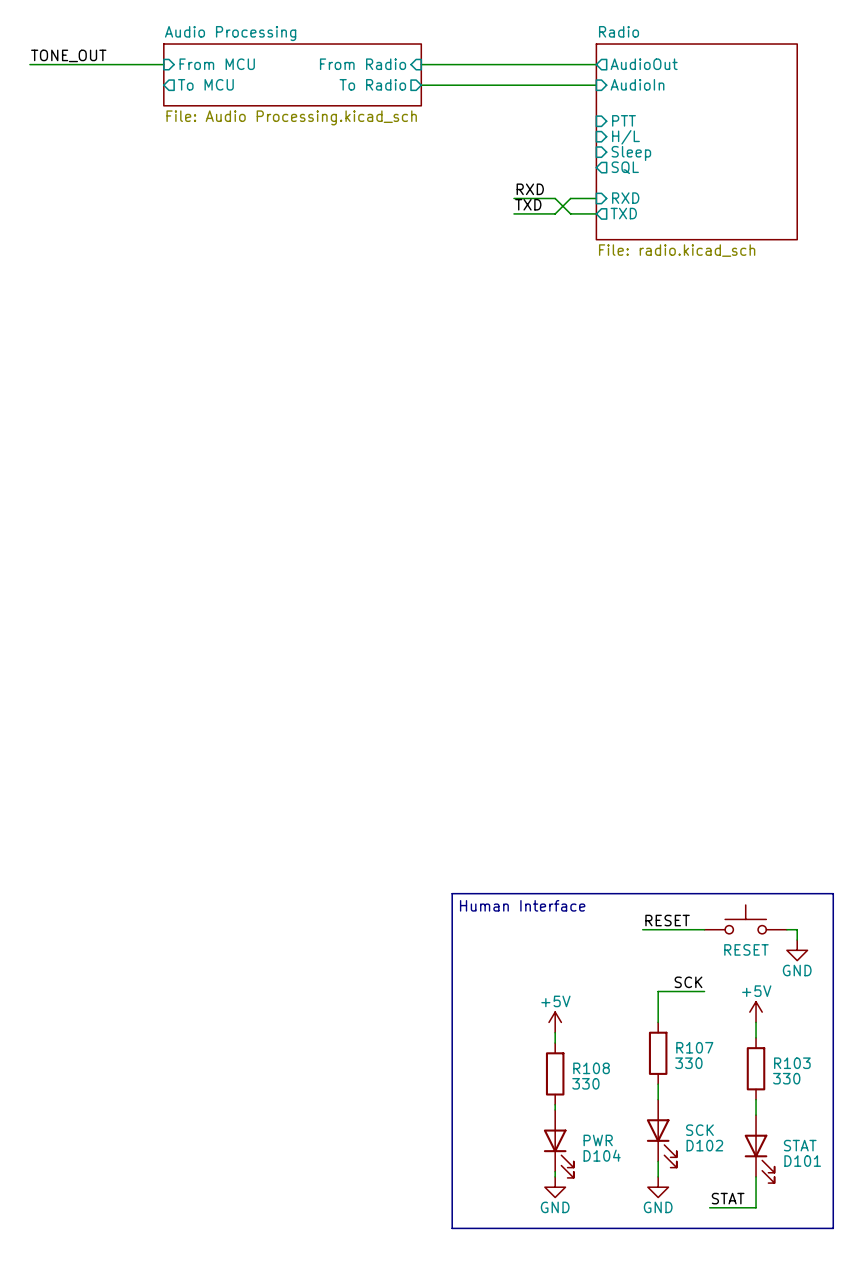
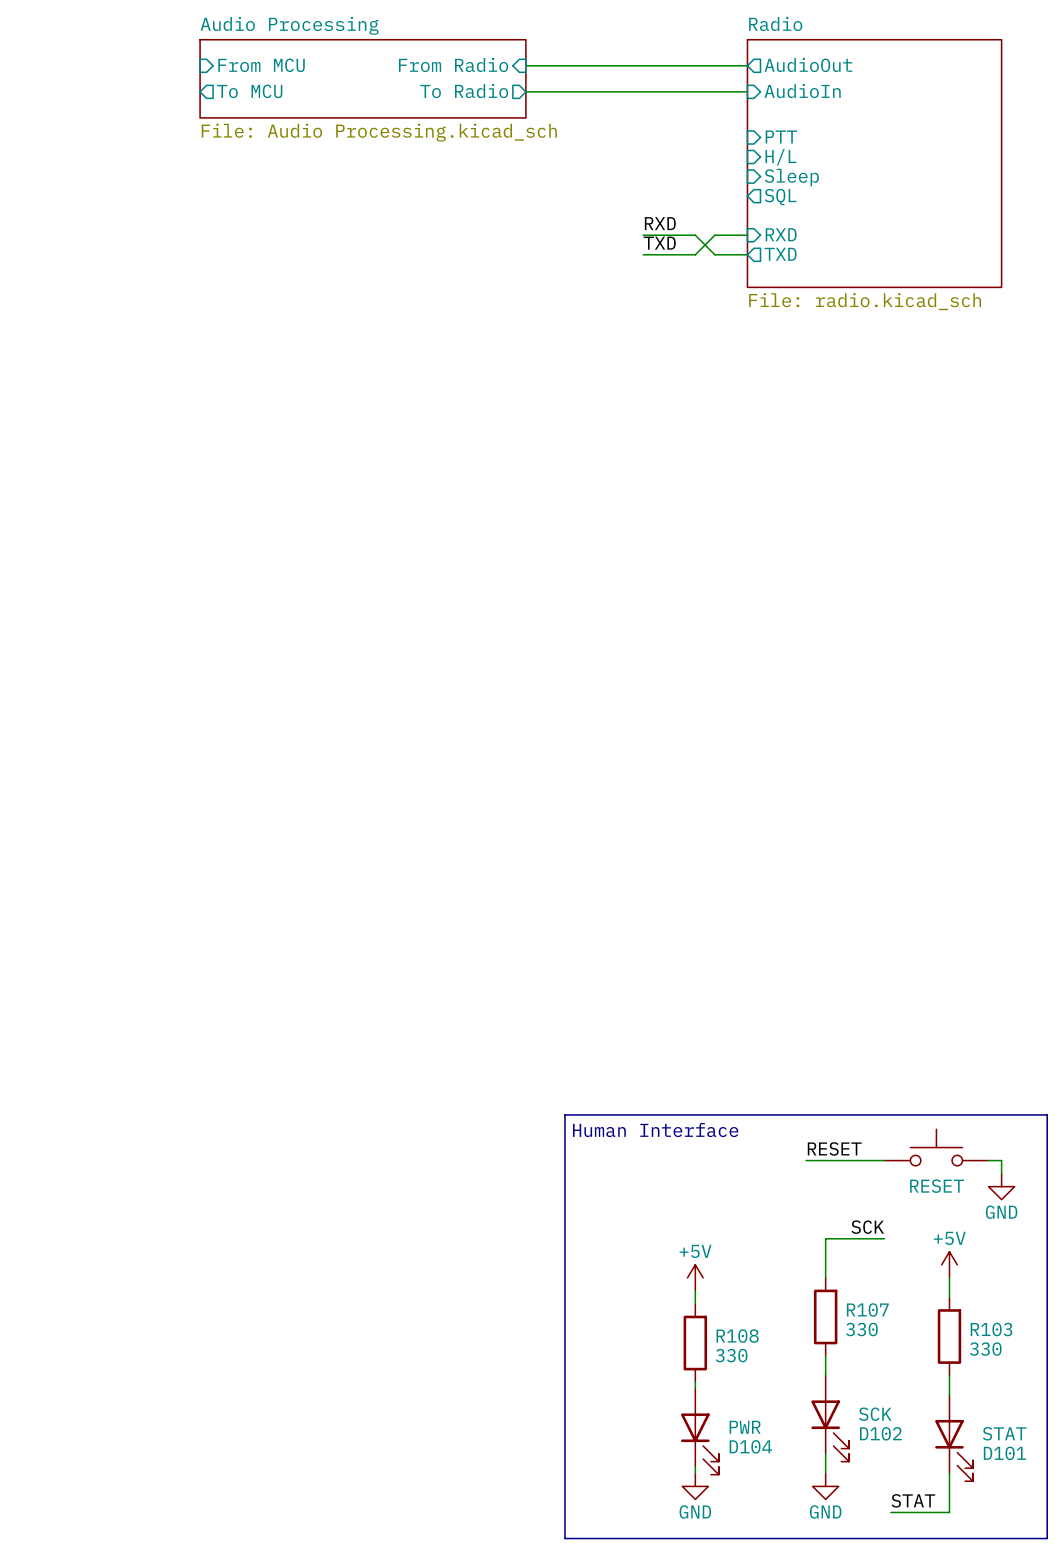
label: TONE_OUT (68, 55) -> none
wire: (29, 64) (163, 64) -> none

